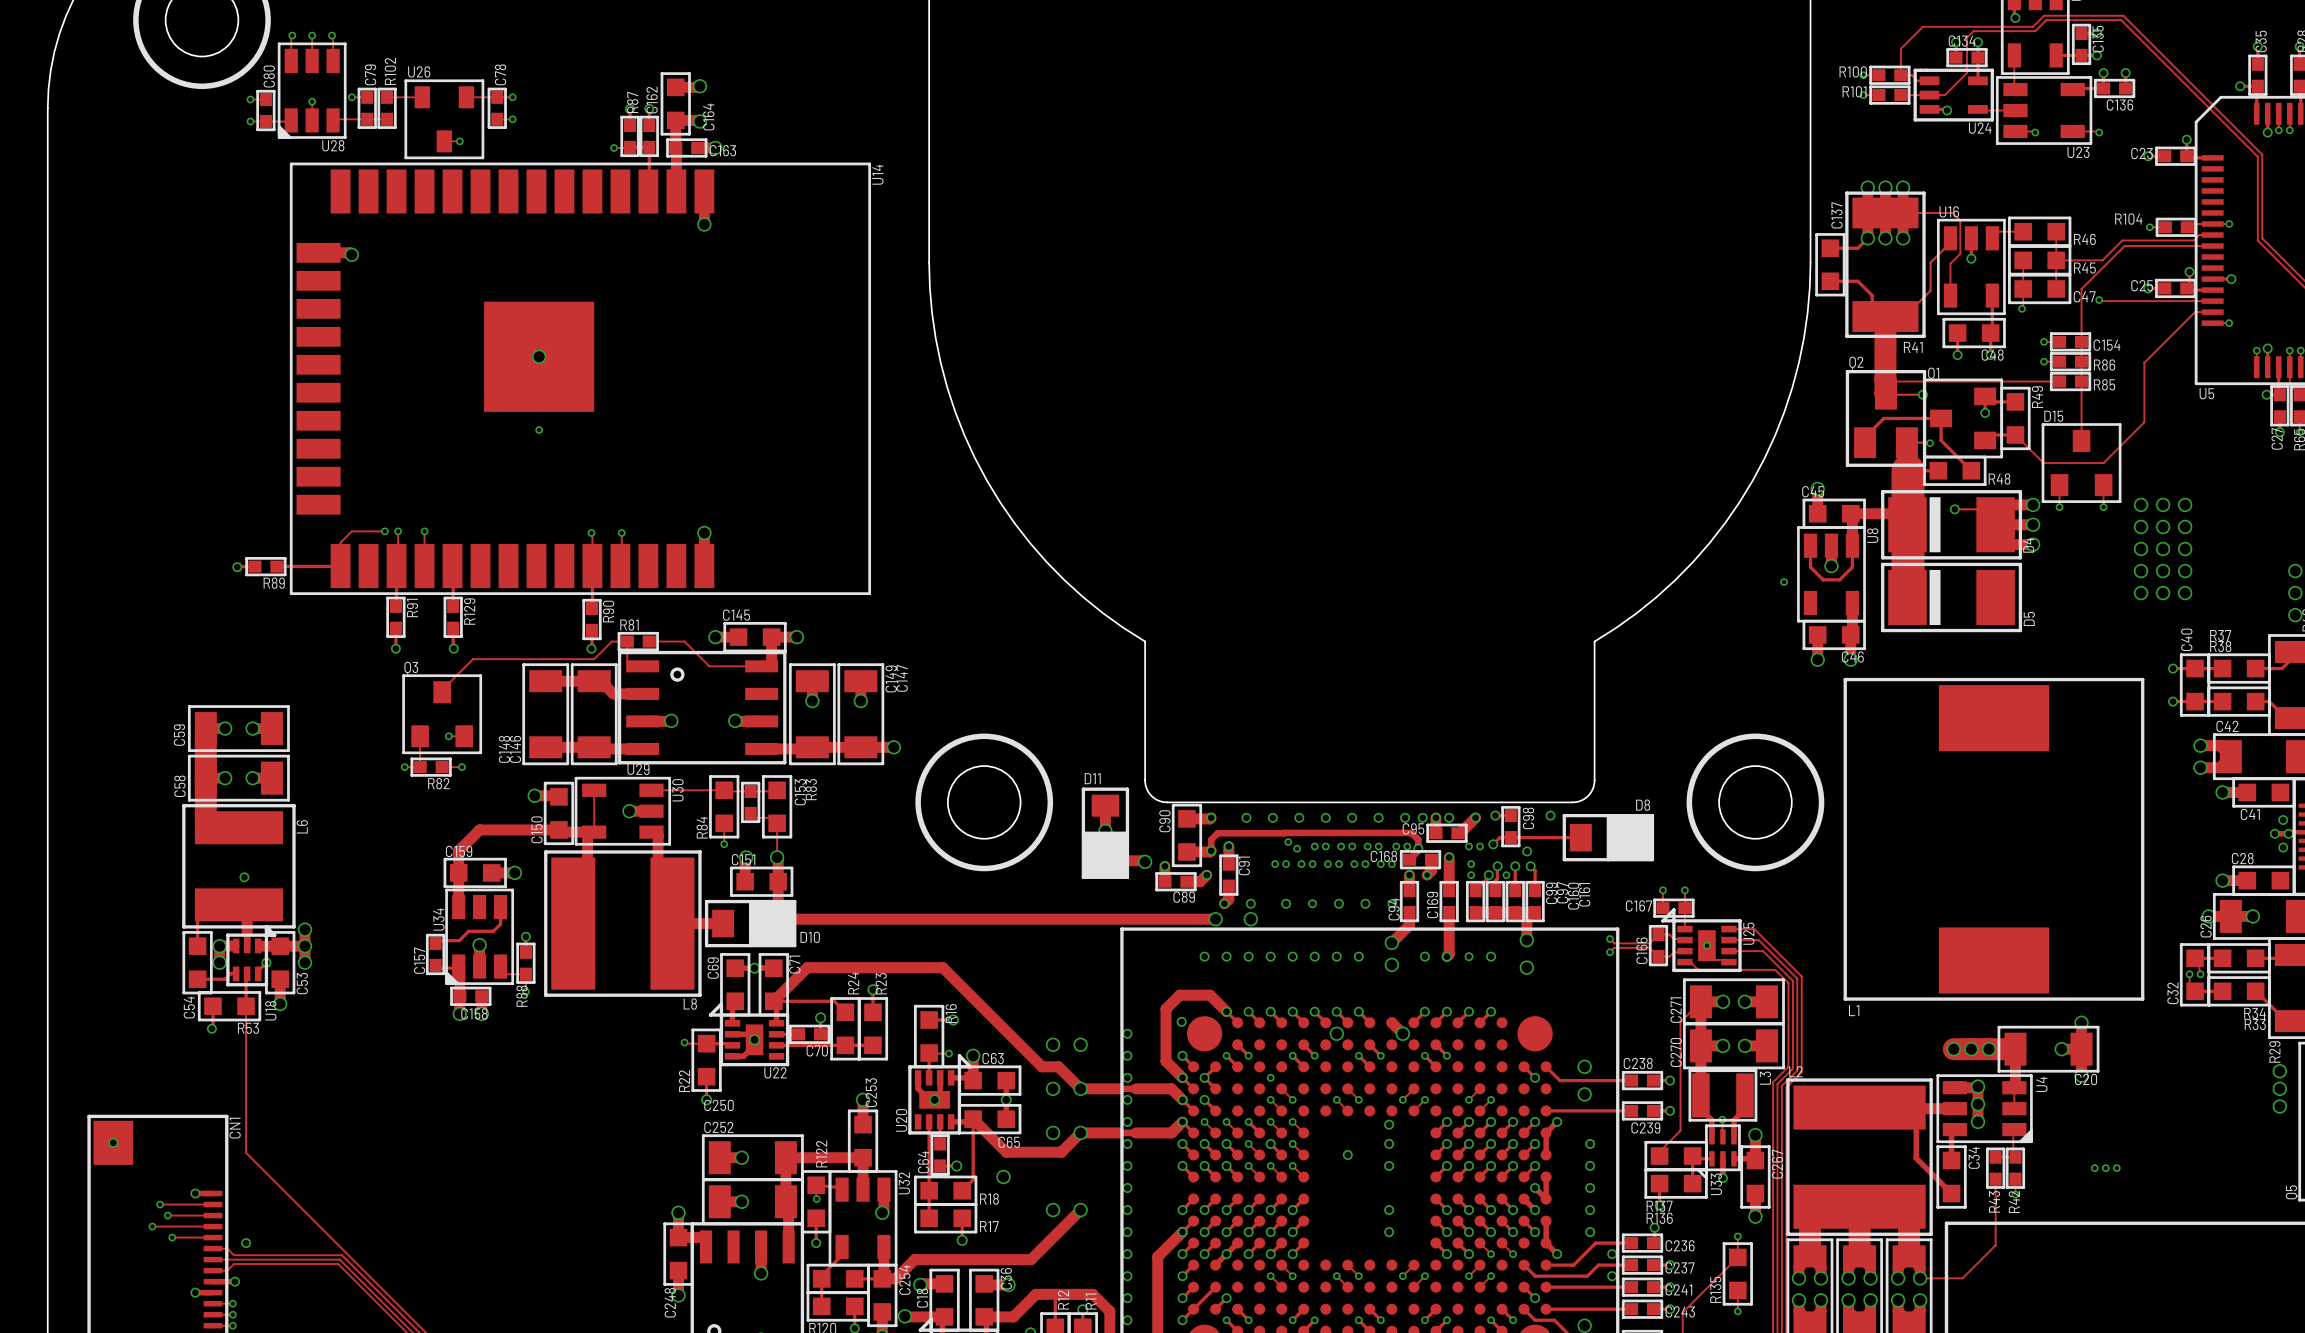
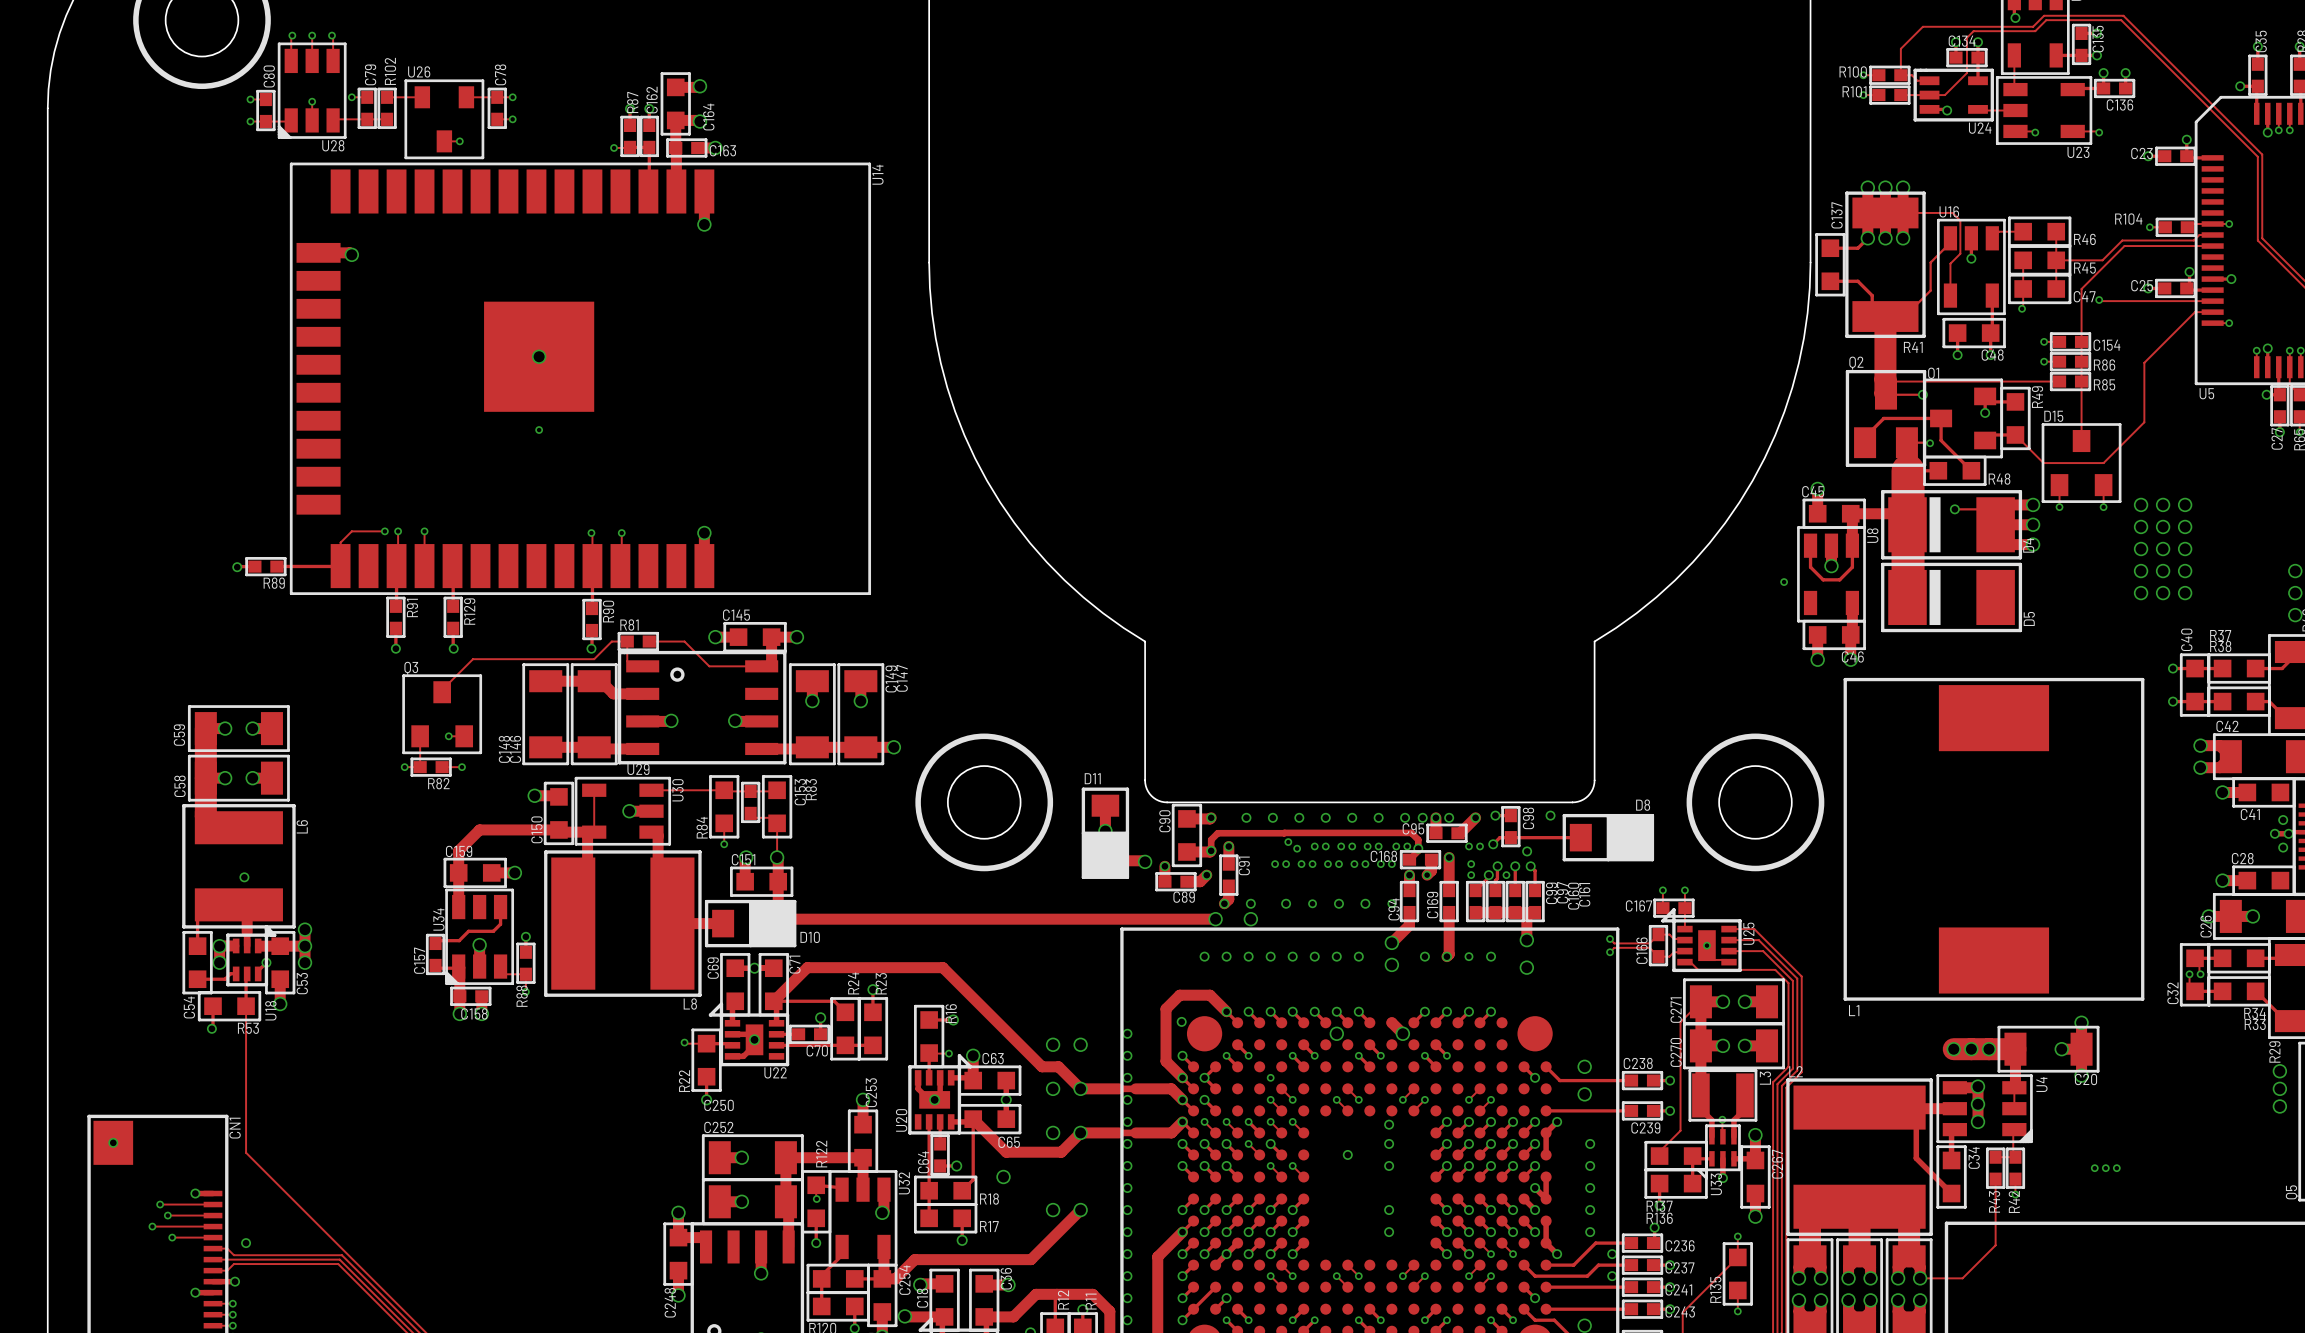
track: (1292, 1143) (1303, 1154) -> none
via: (1292, 1143) -> none
track: (1248, 1165) (1259, 1176) -> none
via: (1248, 1165) -> none

